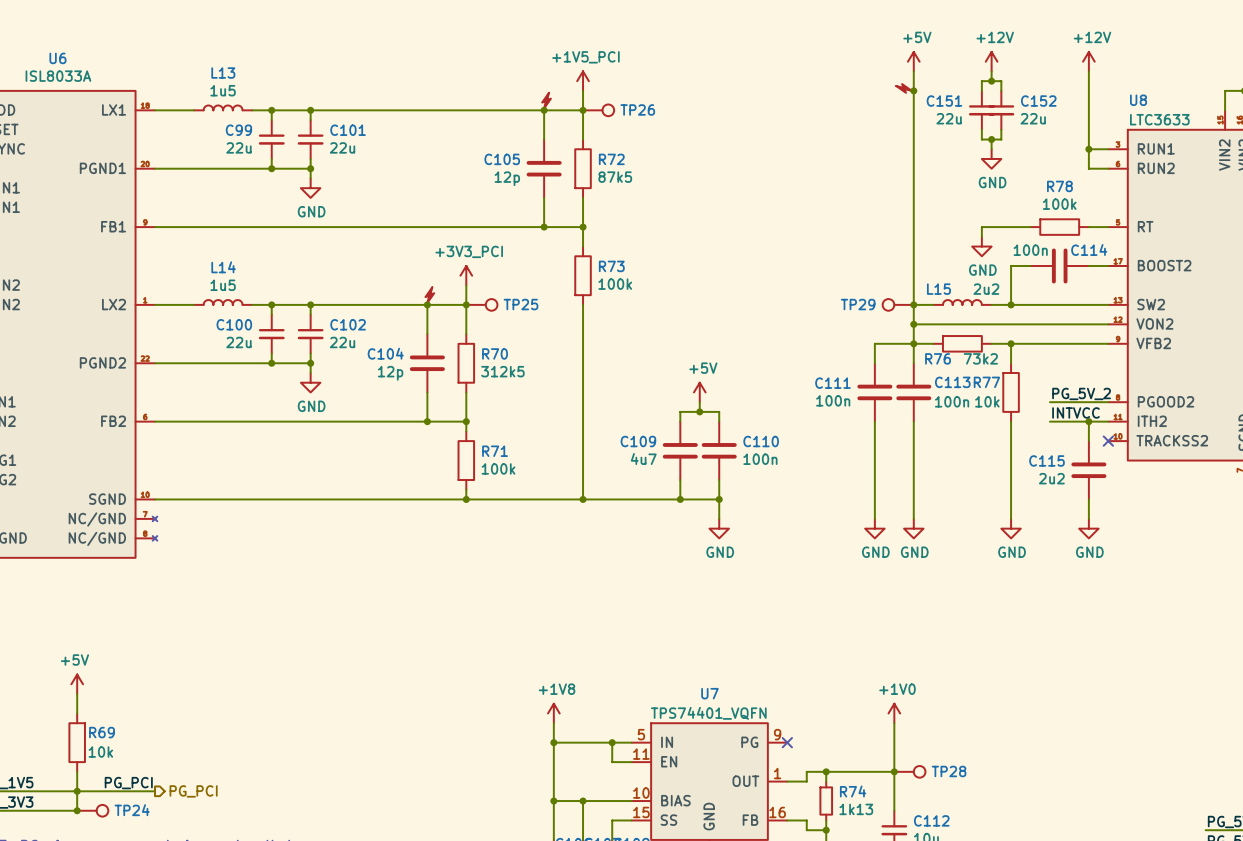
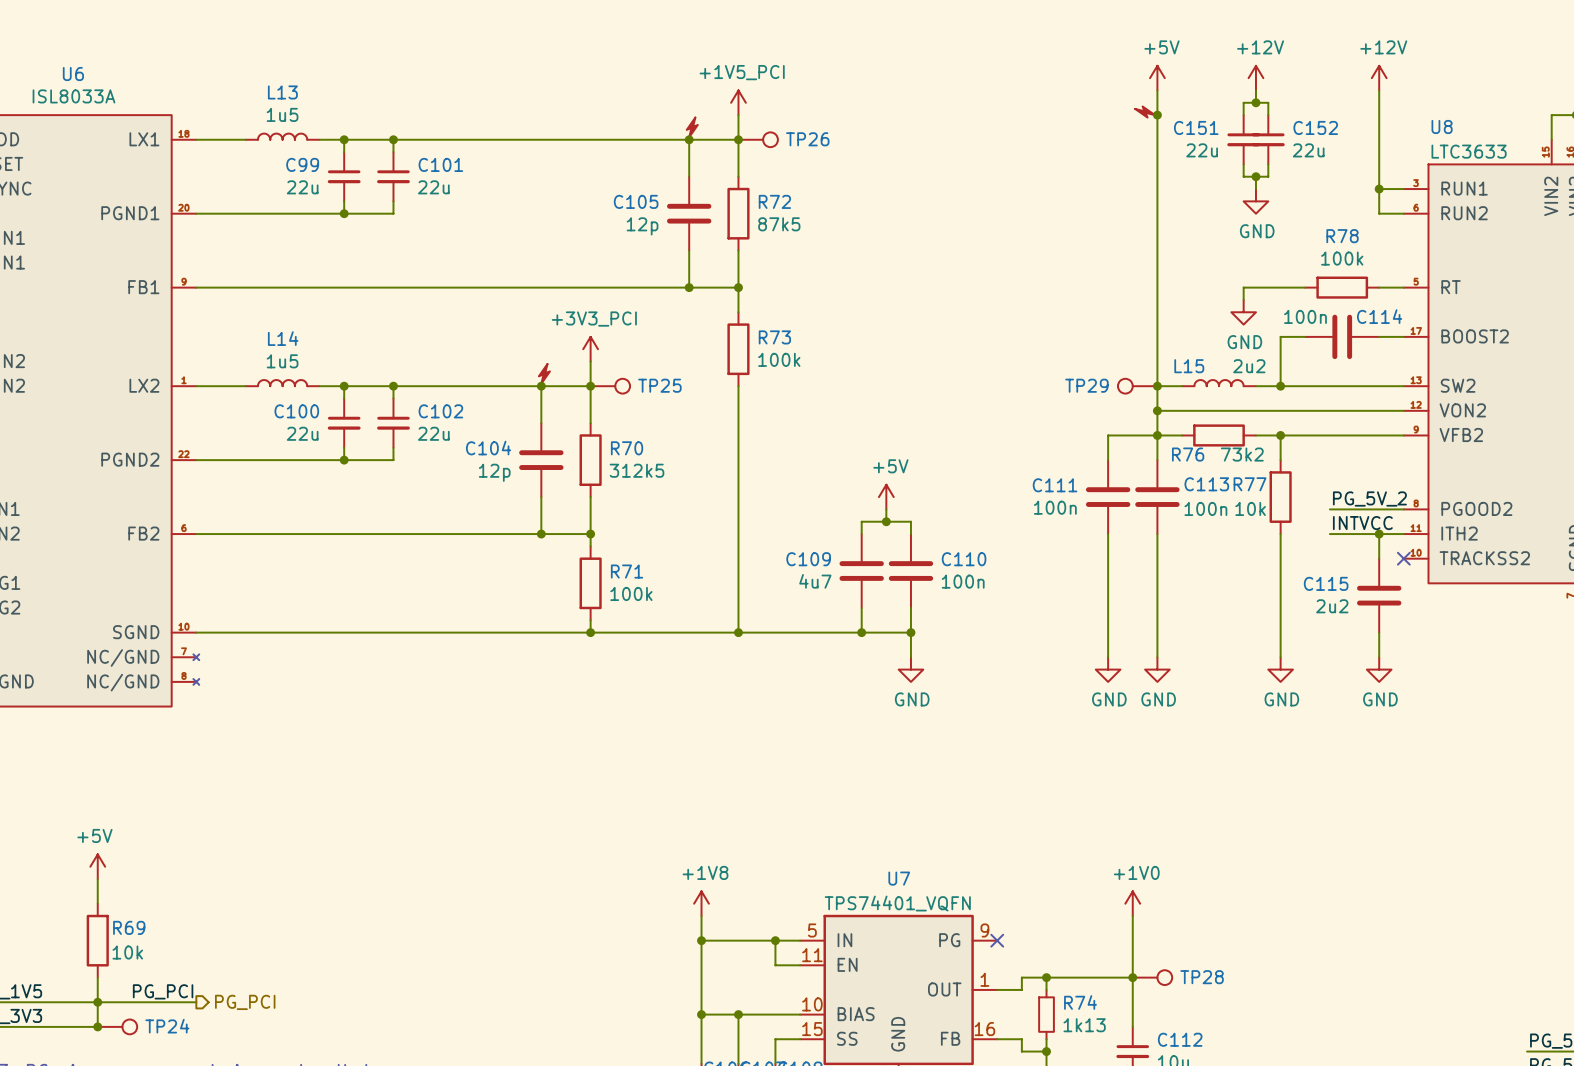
wire: (310, 168) (310, 178) -> none
junction: (310, 168) -> none
power symbol: GND (310, 188) -> none
wire: (310, 363) (310, 372) -> none
junction: (310, 363) -> none
power symbol: GND (310, 382) -> none

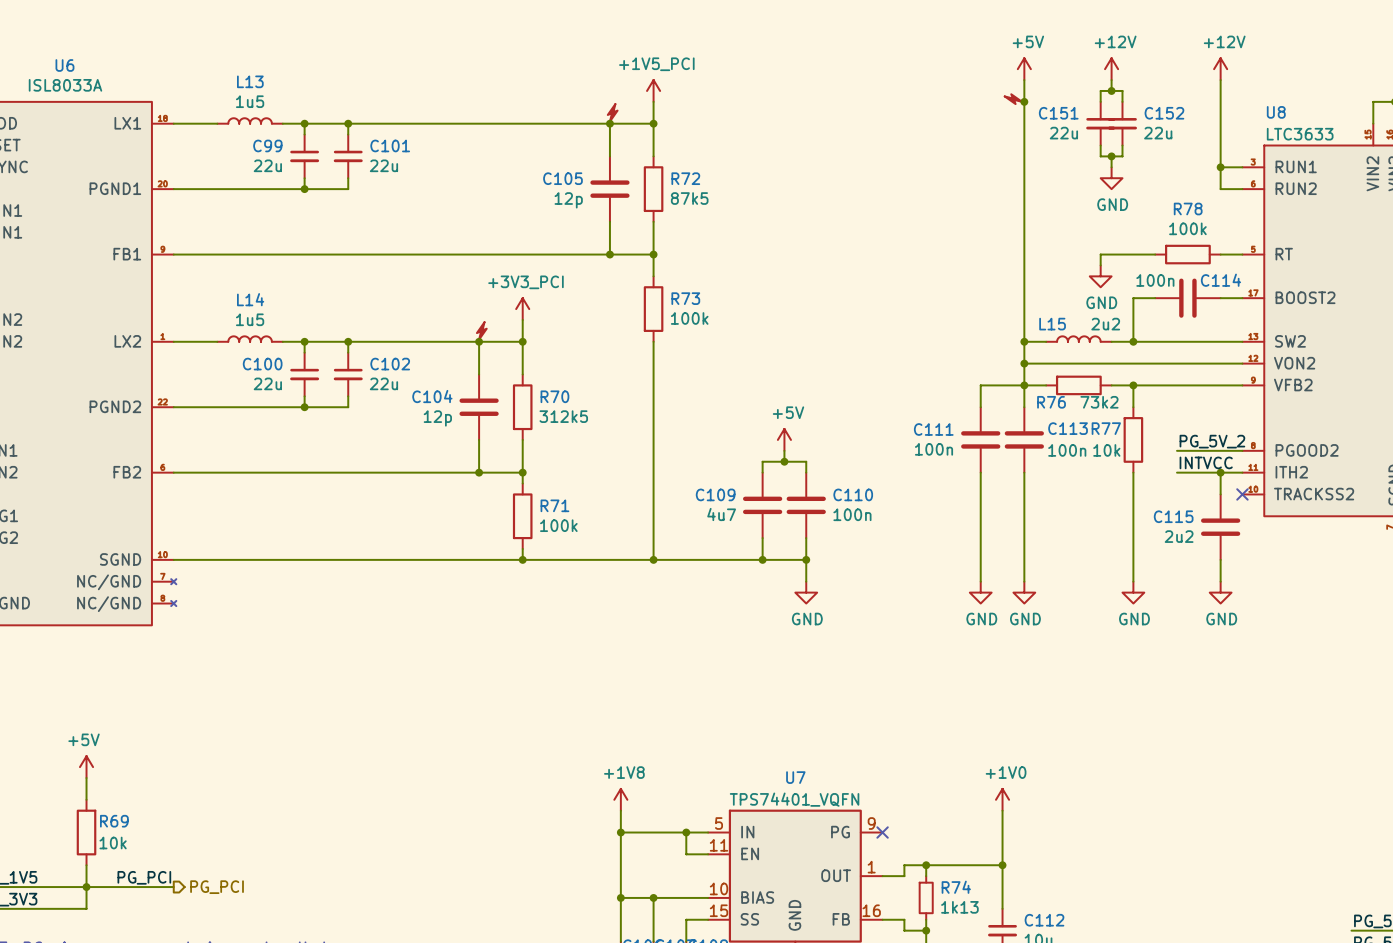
TP26: (758, 139) -> none
TP25: (610, 386) -> none
TP29: (1137, 386) -> none
TP28: (1152, 977) -> none
junction: (97, 1026) -> none
TP24: (117, 1026) -> none

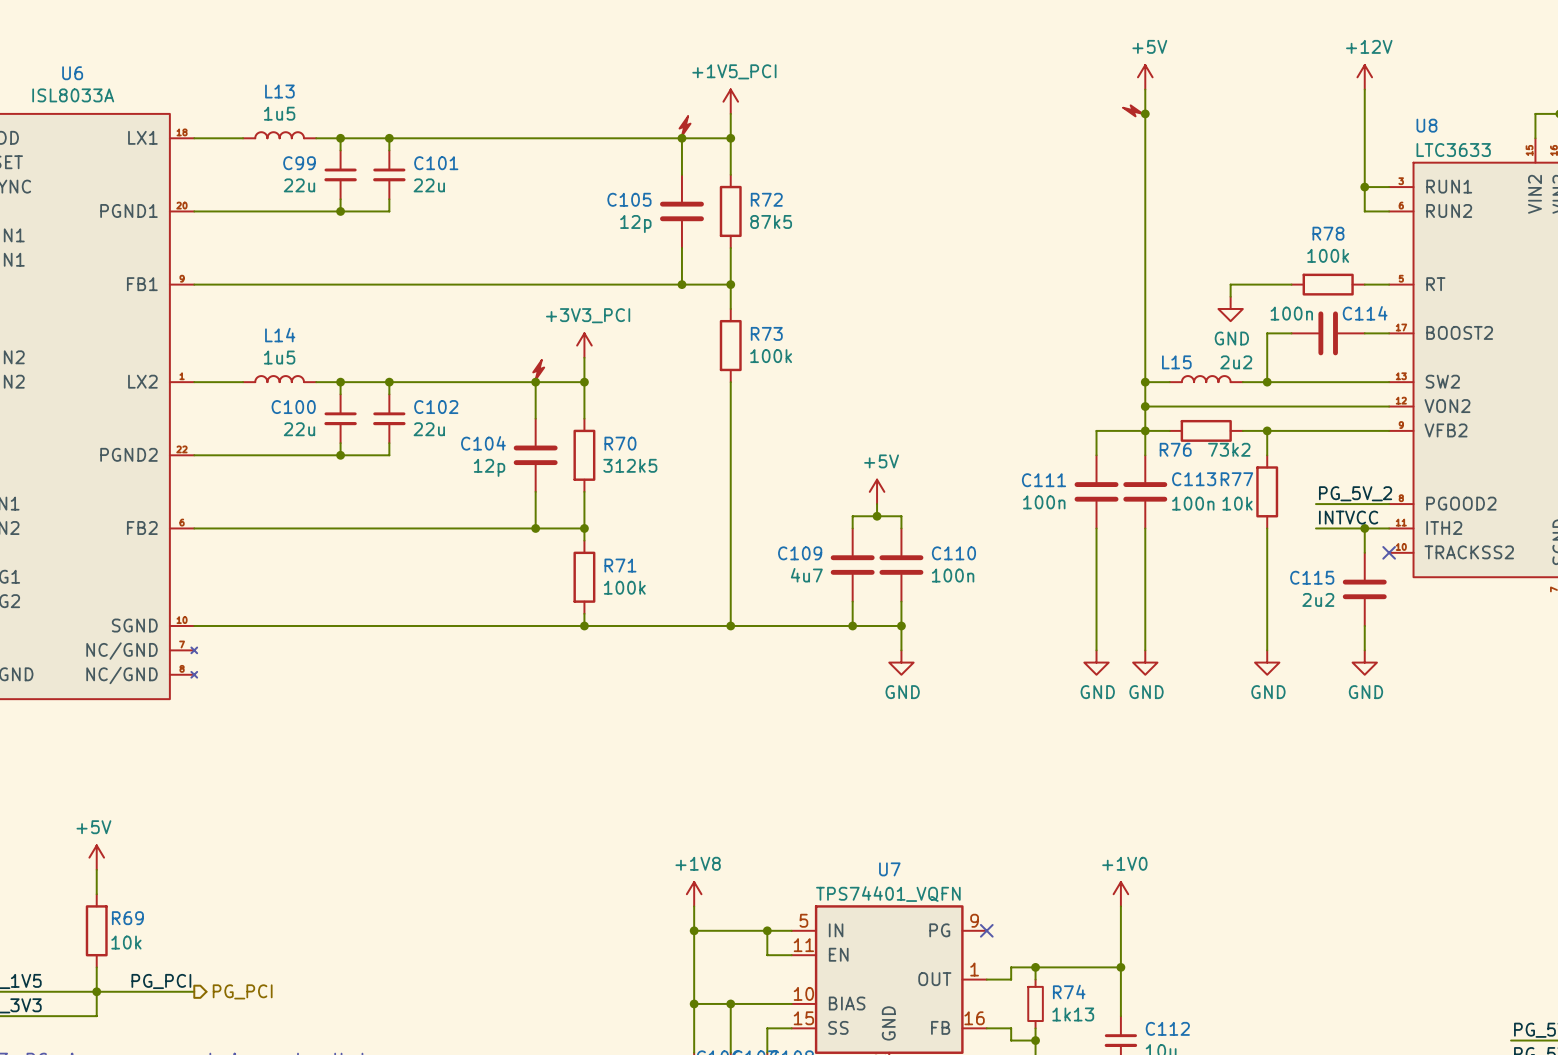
power symbol: +12V (1111, 69) -> none
wire: (1111, 80) (1111, 90) -> none
junction: (1111, 90) -> none
wire: (1100, 101) (1100, 90) (1122, 90) (1122, 101) -> none
C151: 22u (1100, 123) -> none
C152: 22u (1122, 123) -> none
wire: (1100, 145) (1100, 156) (1122, 156) (1122, 145) -> none
wire: (1111, 156) (1111, 167) -> none
junction: (1111, 156) -> none
power symbol: GND (1111, 178) -> none

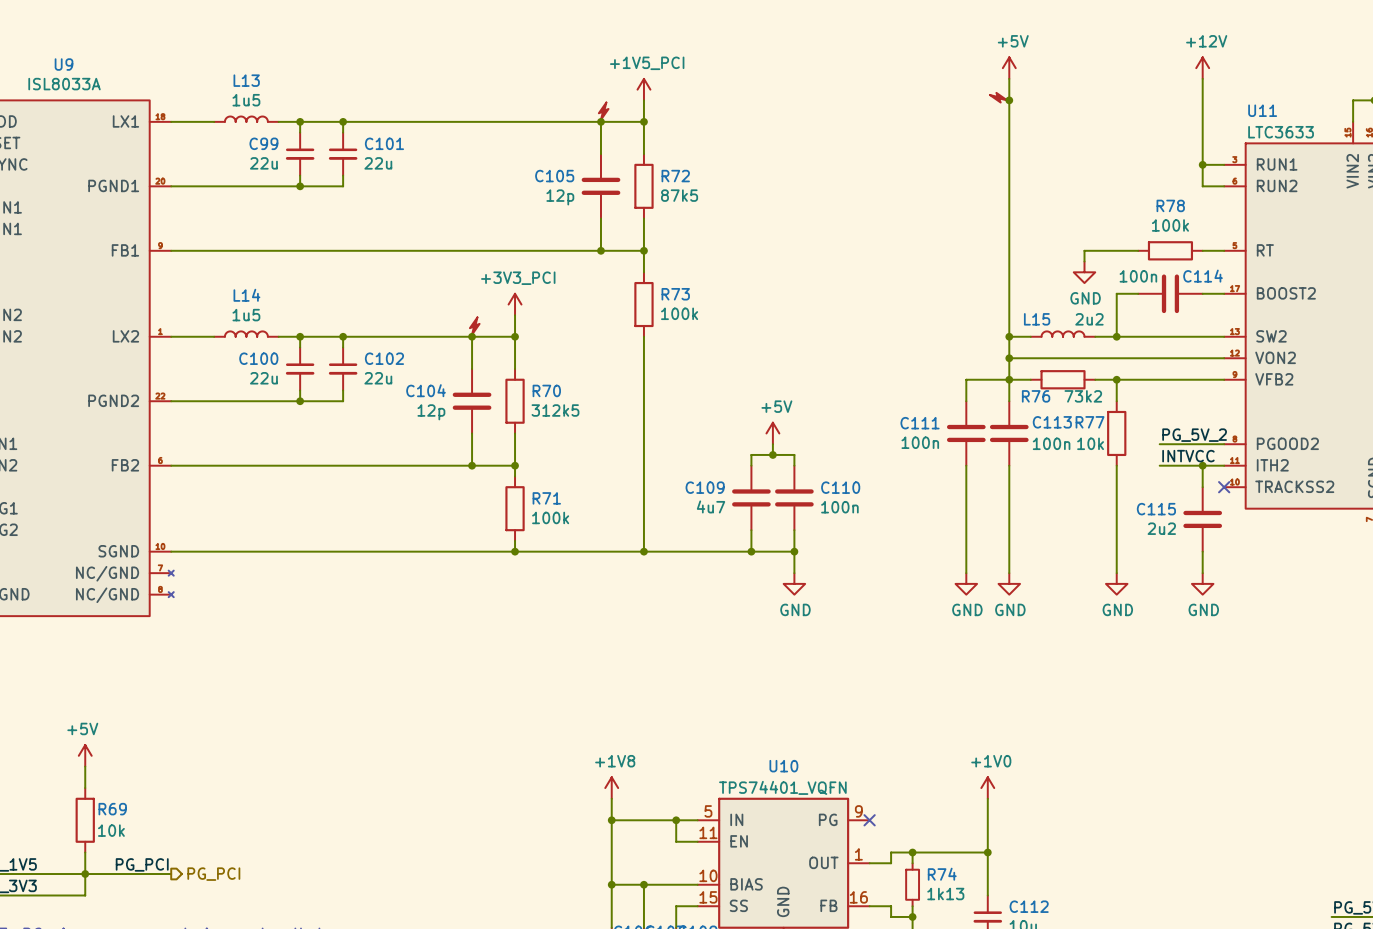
U6 name: U6 (72, 73) -> U9 (64, 64)
U8 name: U8 (1426, 125) -> U11 (1262, 110)
U7 name: U7 (889, 869) -> U10 (783, 766)

